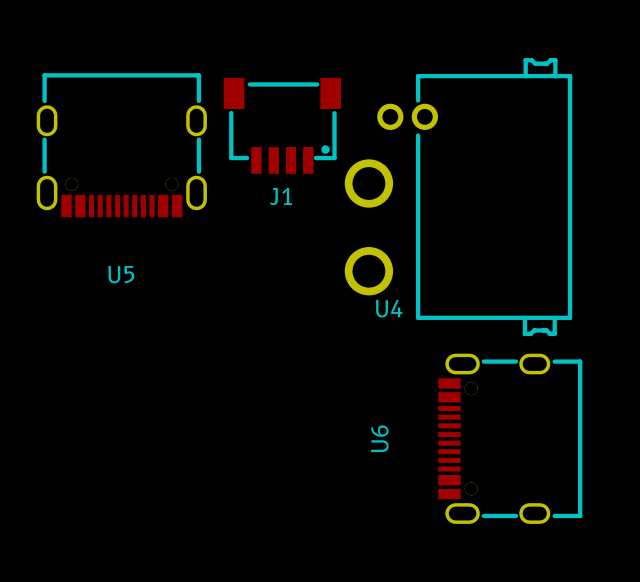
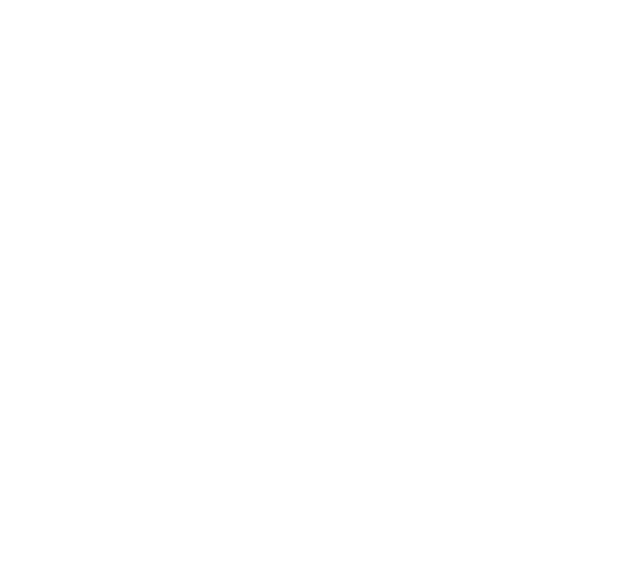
J1: (282, 125) -> none
U5: (121, 145) -> none
U4: (458, 197) -> none
U6: (510, 438) -> none

